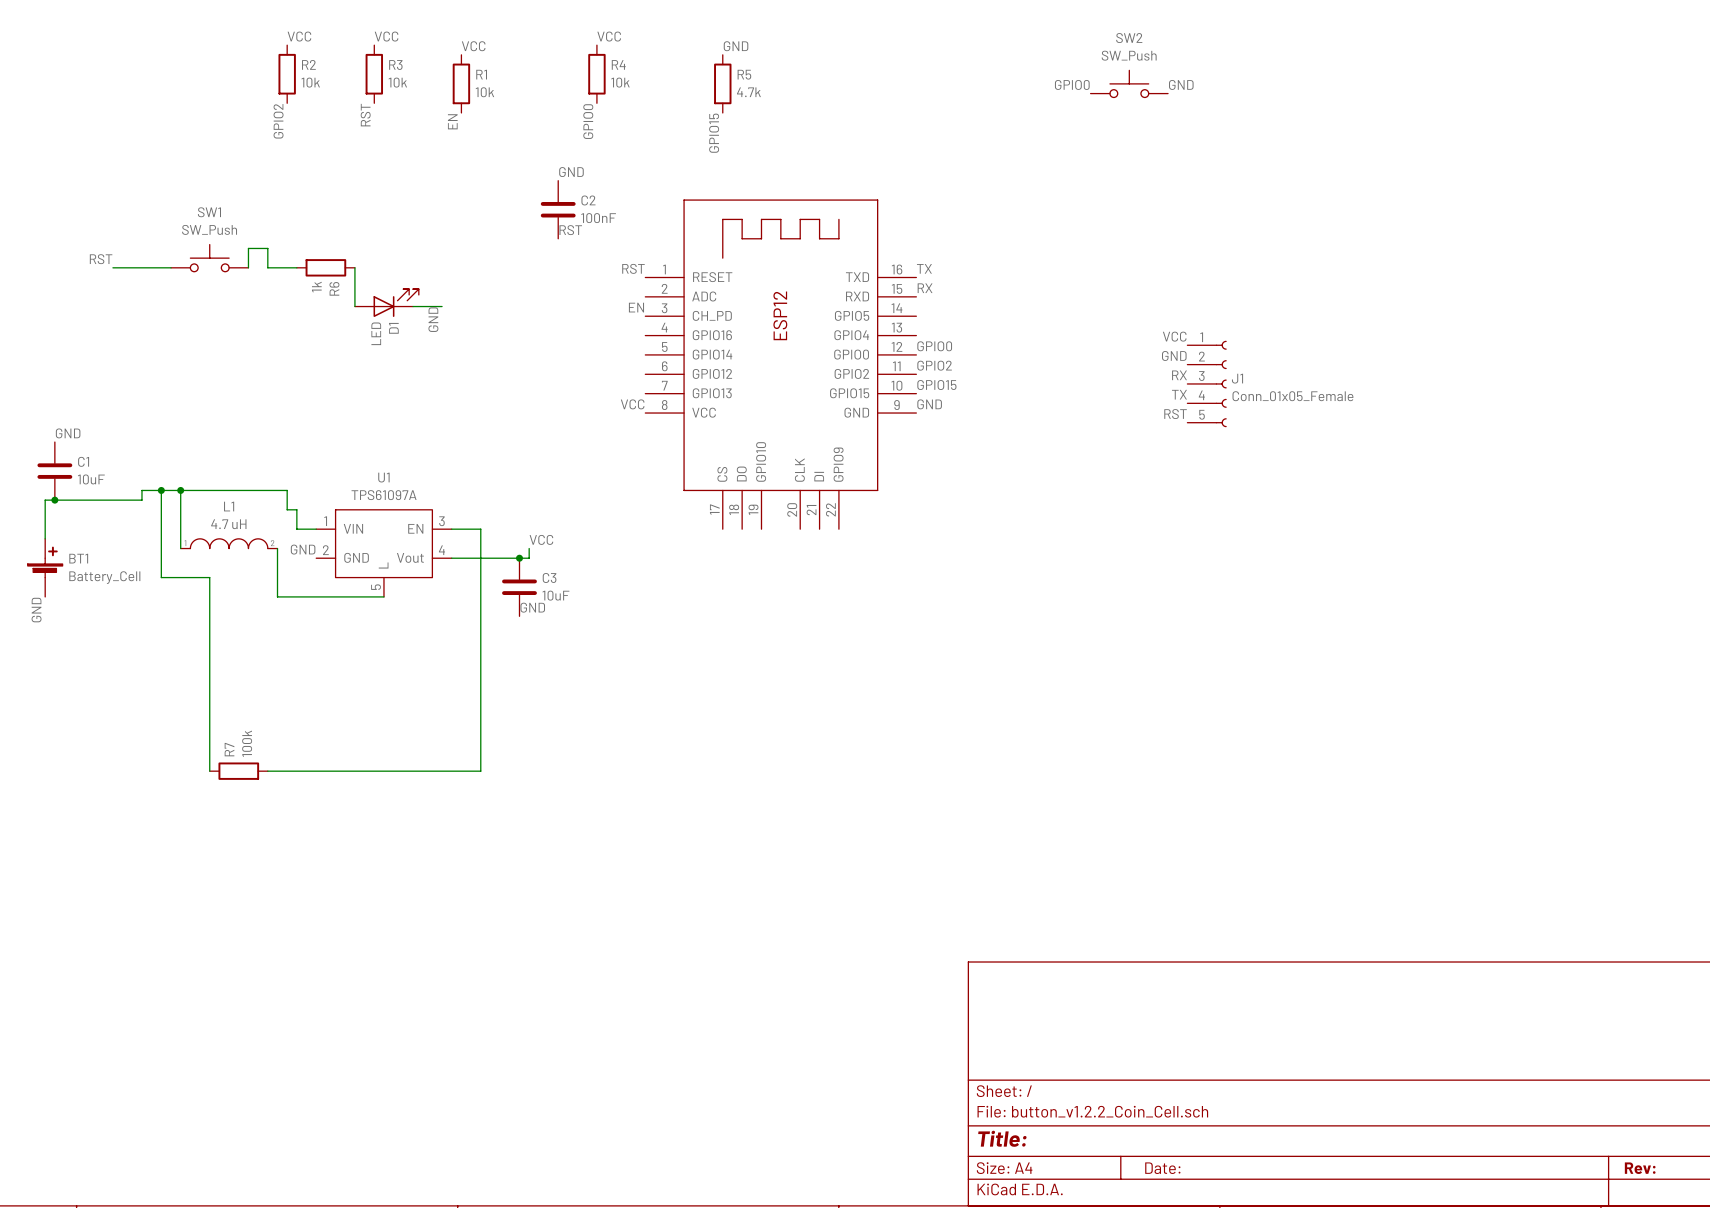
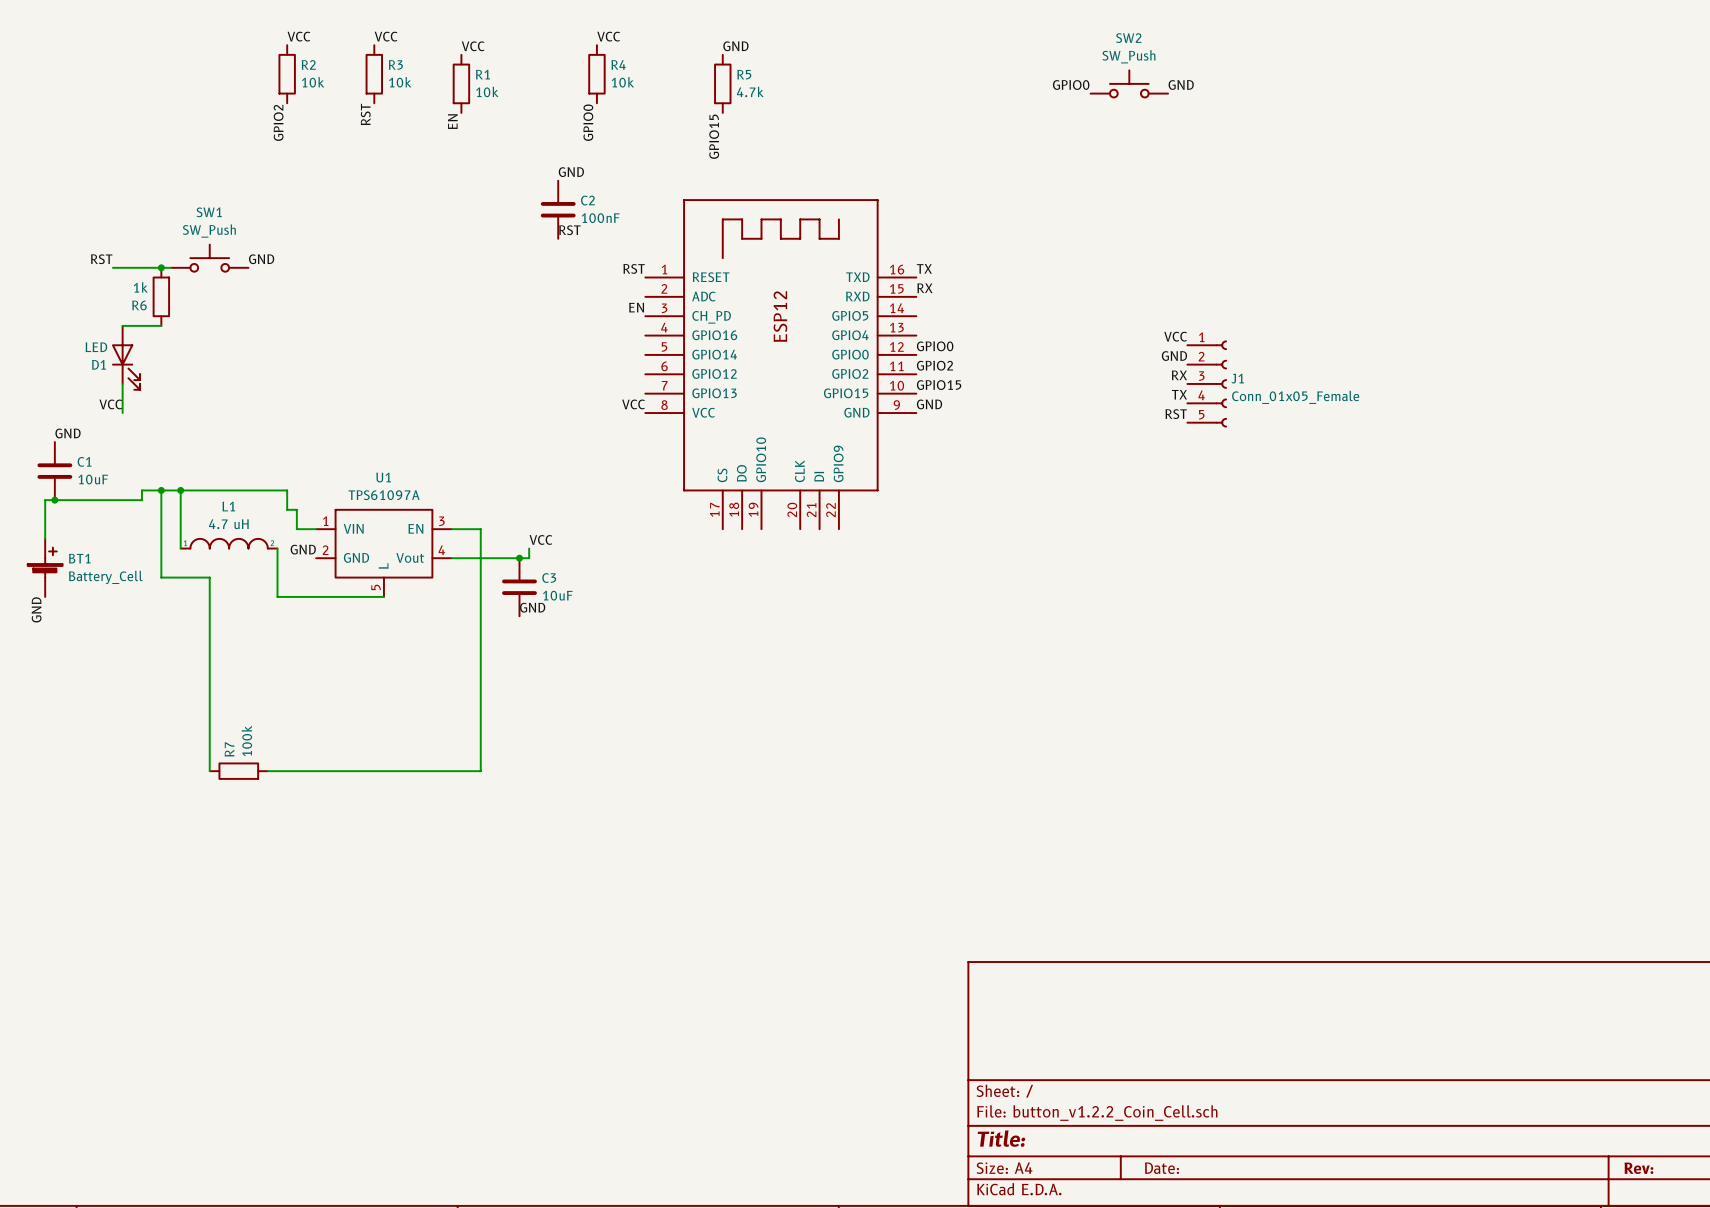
label: none -> GND (261, 259)
junction: none -> (161, 267)
wire: (248, 267) (248, 248) (267, 248) (267, 267) (296, 267) -> none
R6 rotation: 0° (325, 267) -> 90° clockwise (161, 296)
R6 position: (325, 267) -> (161, 296)
wire: (354, 267) (354, 306) -> none
D1 position: (386, 303) -> (126, 357)
D1 rotation: 0° (396, 303) -> 90° clockwise (126, 367)
wire: (413, 306) (442, 306) -> none
label: GND (433, 319) -> none
wire: none -> (122, 325) (161, 325)
wire: none -> (122, 383) (122, 413)
label: none -> VCC (110, 404)

